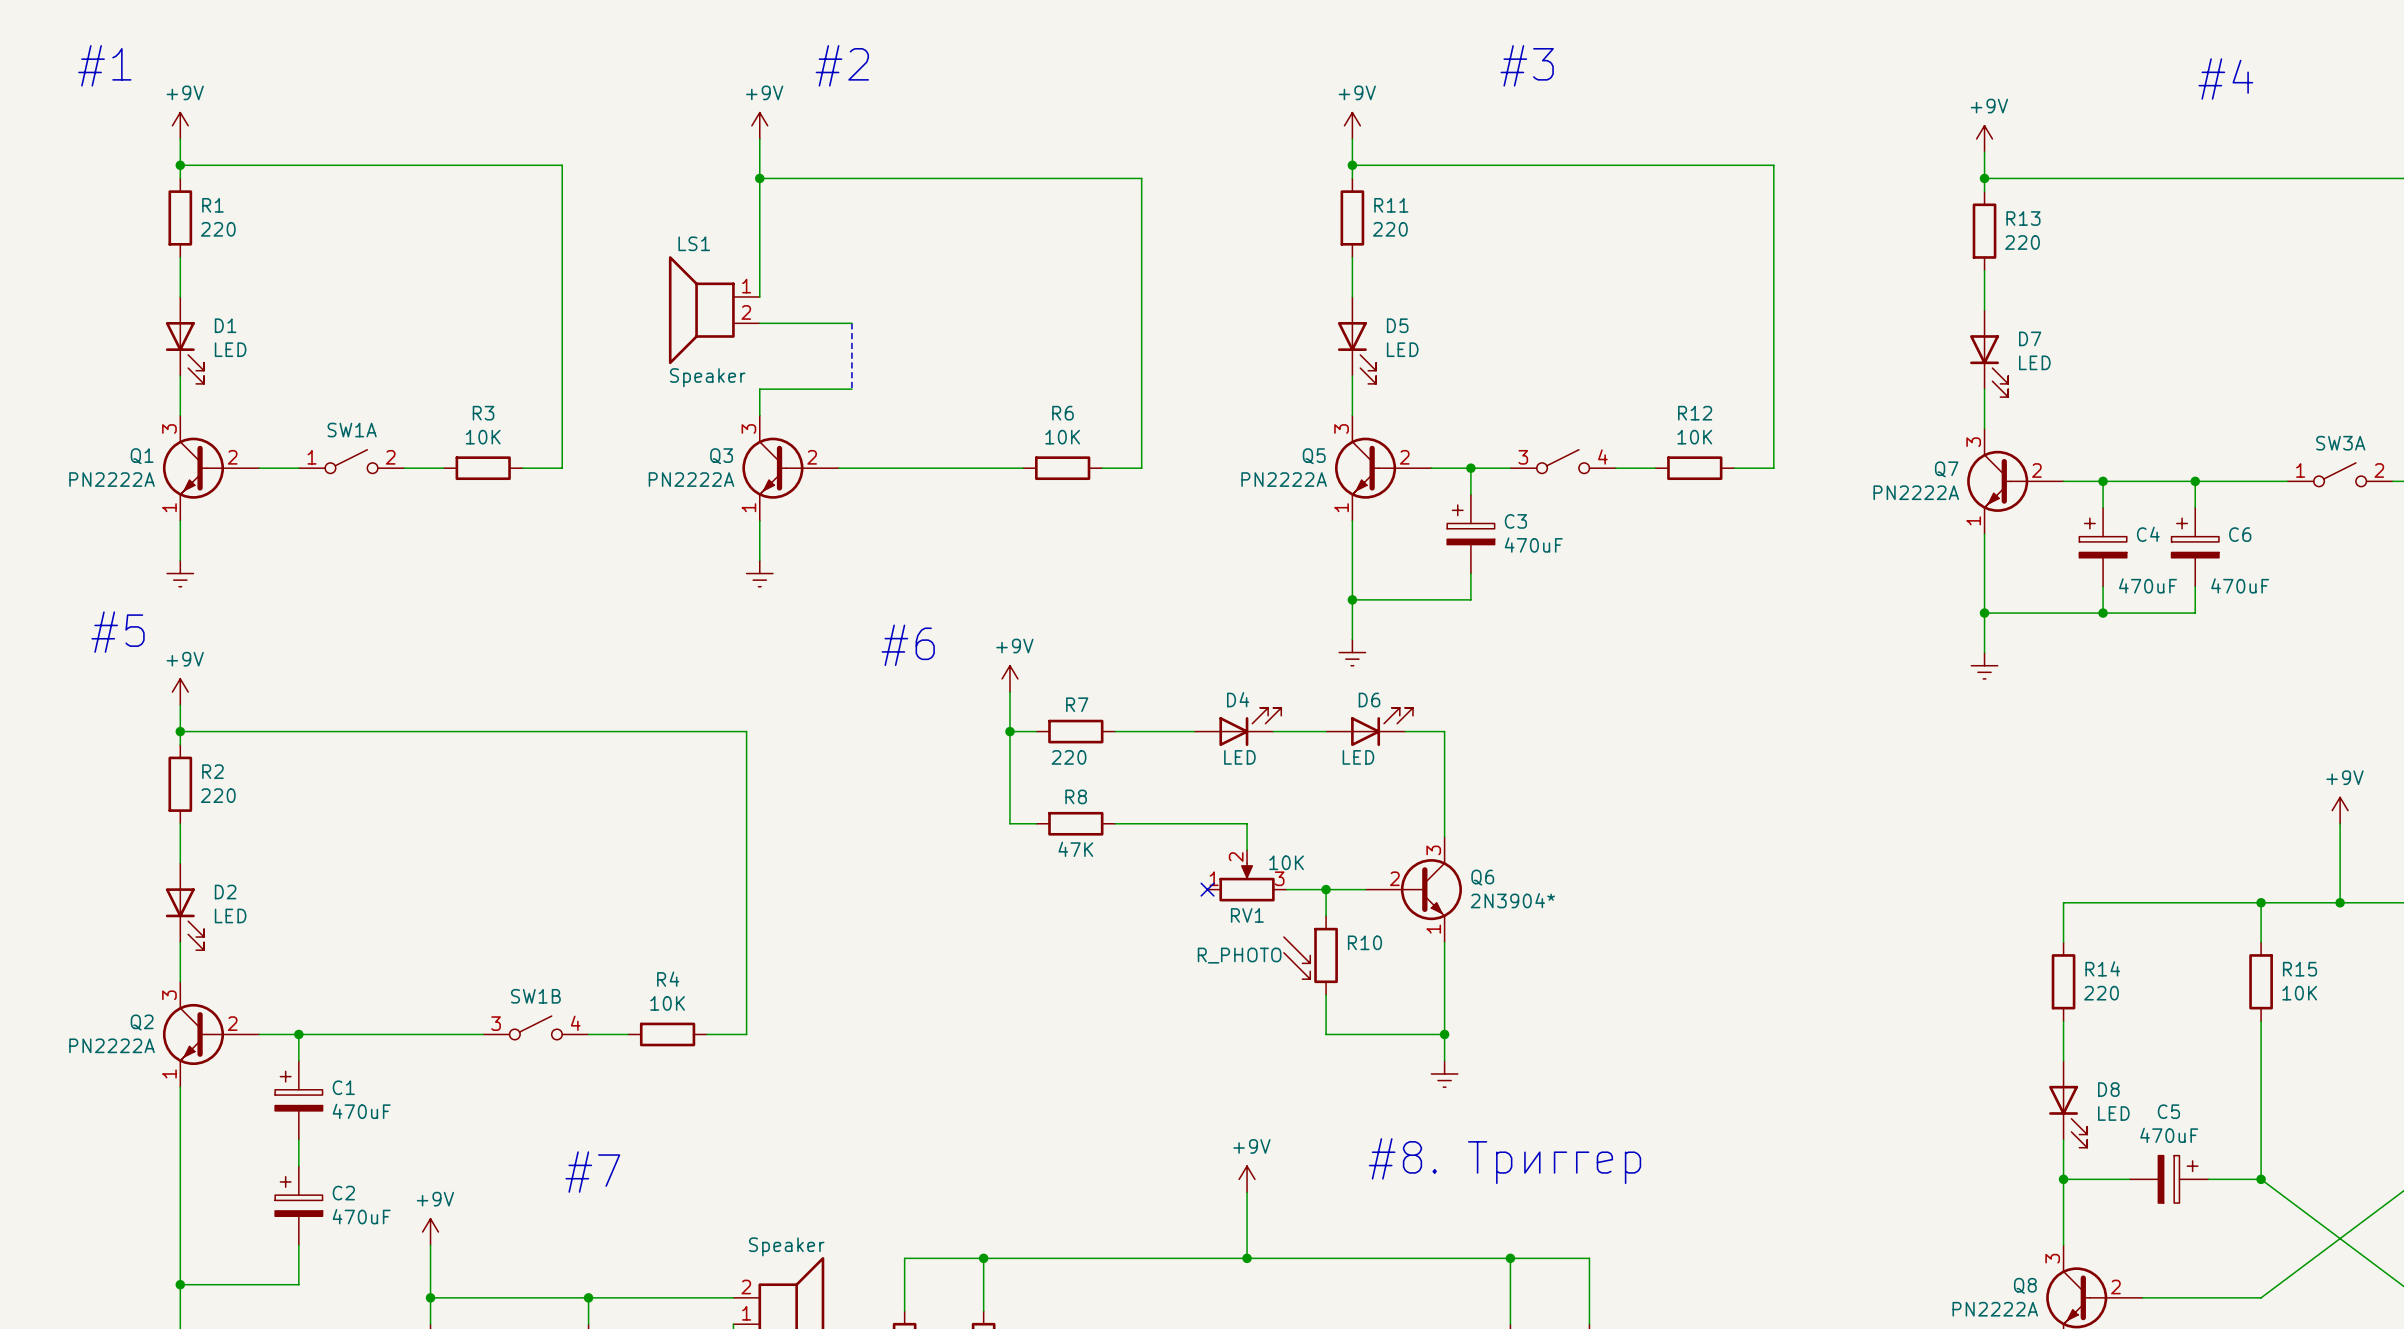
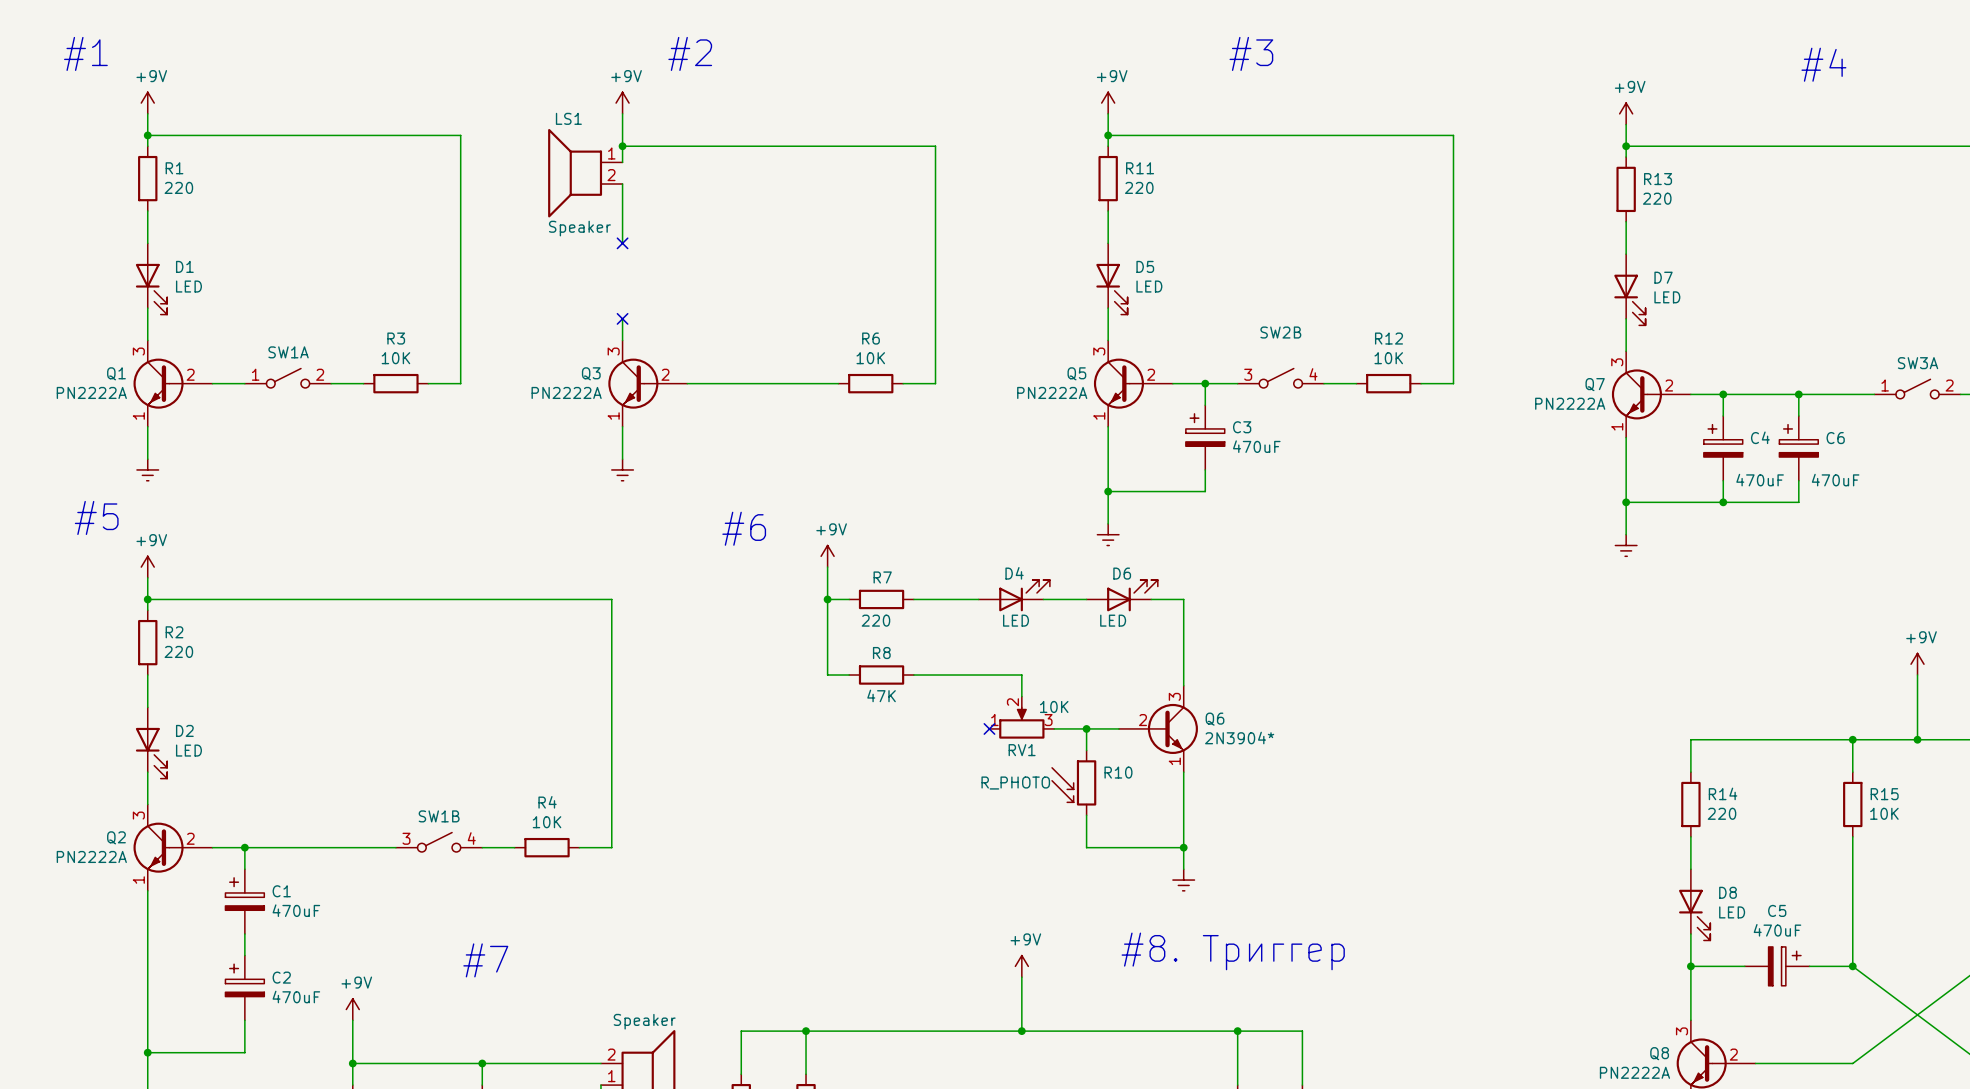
wire: (759, 198) (759, 224) -> none
no-connect mark: none -> (622, 243)
LS1 position: (714, 310) -> (585, 173)
wire: (759, 323) (851, 323) -> none
line: (851, 323) (851, 389) -> none
wire: (759, 389) (851, 389) -> none
no-connect mark: none -> (622, 318)
SW2B name: none -> SW2B (1280, 332)

